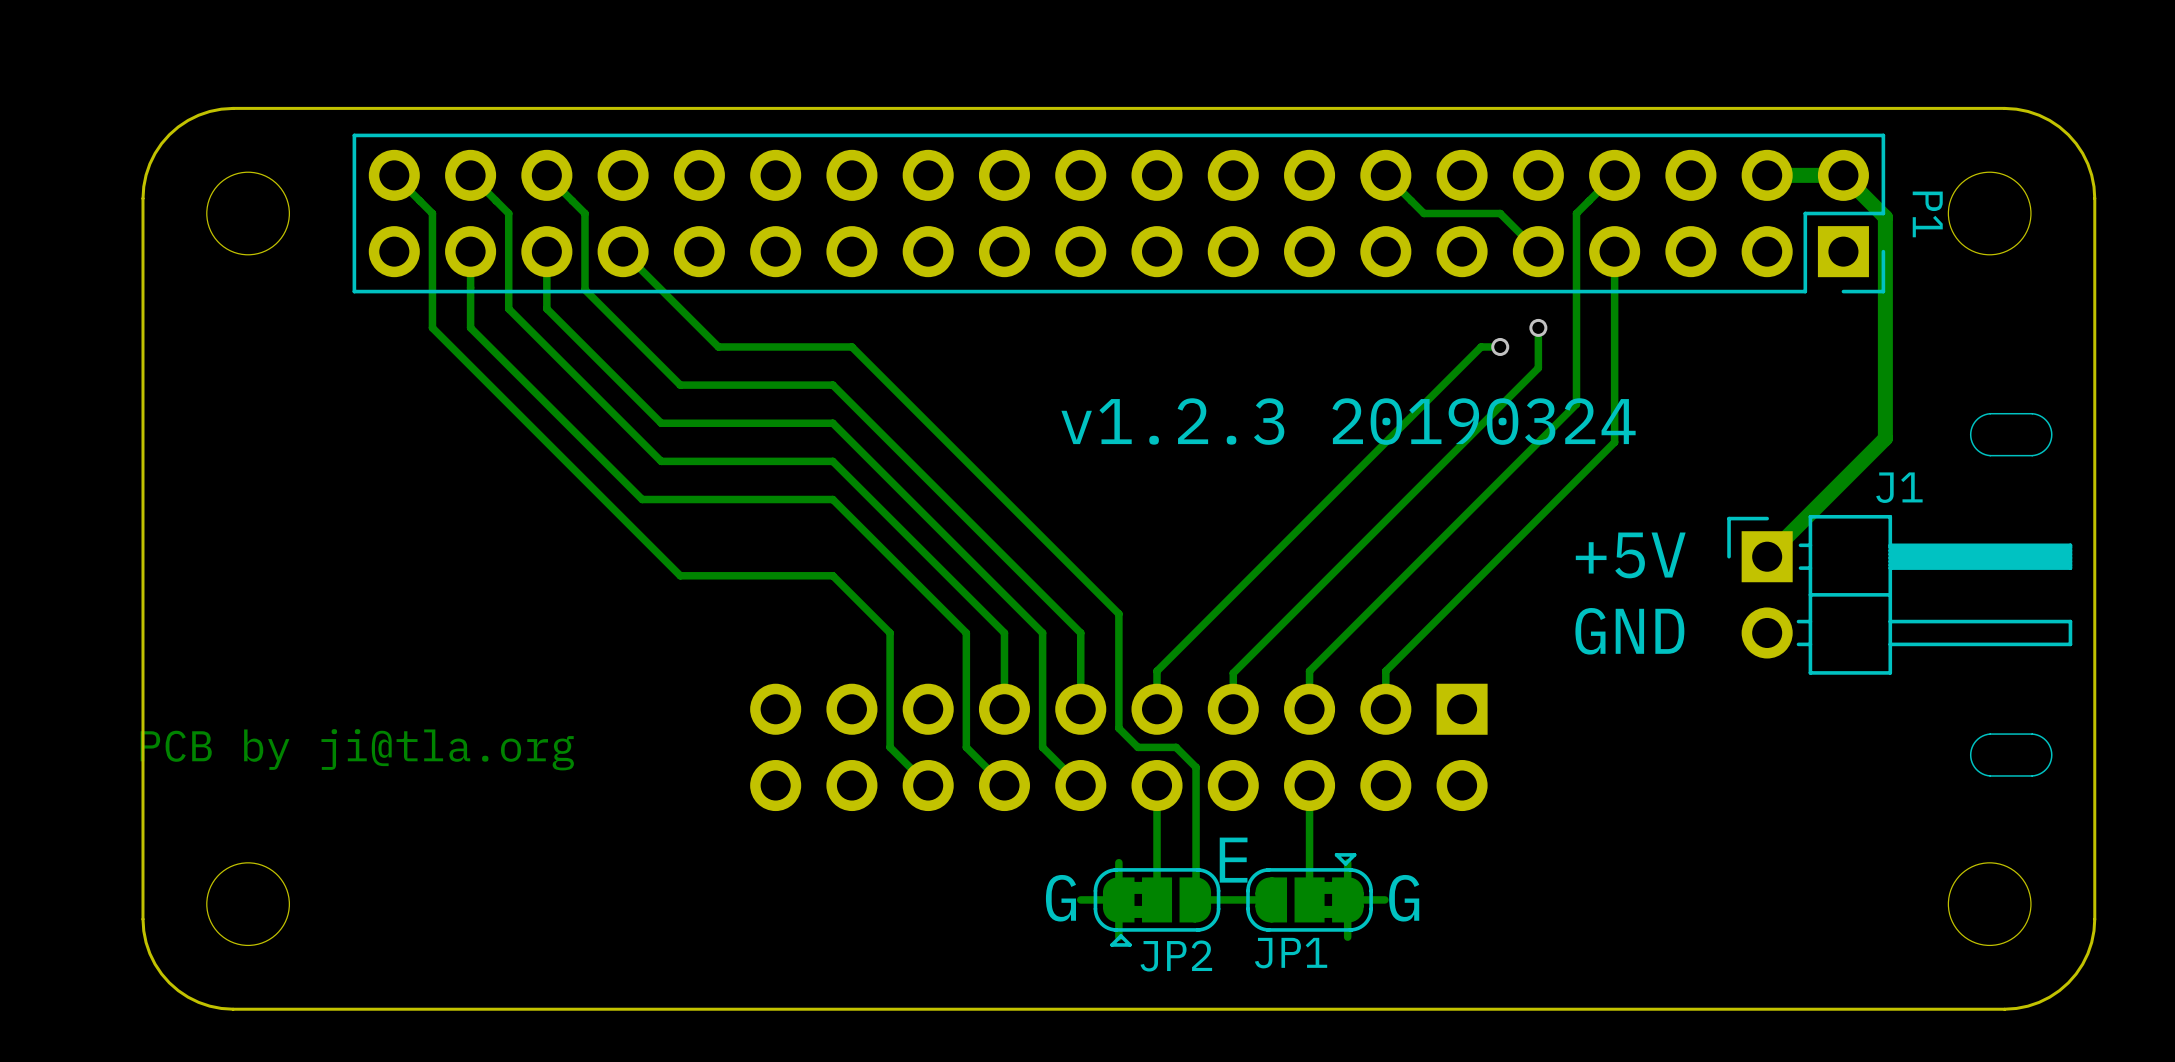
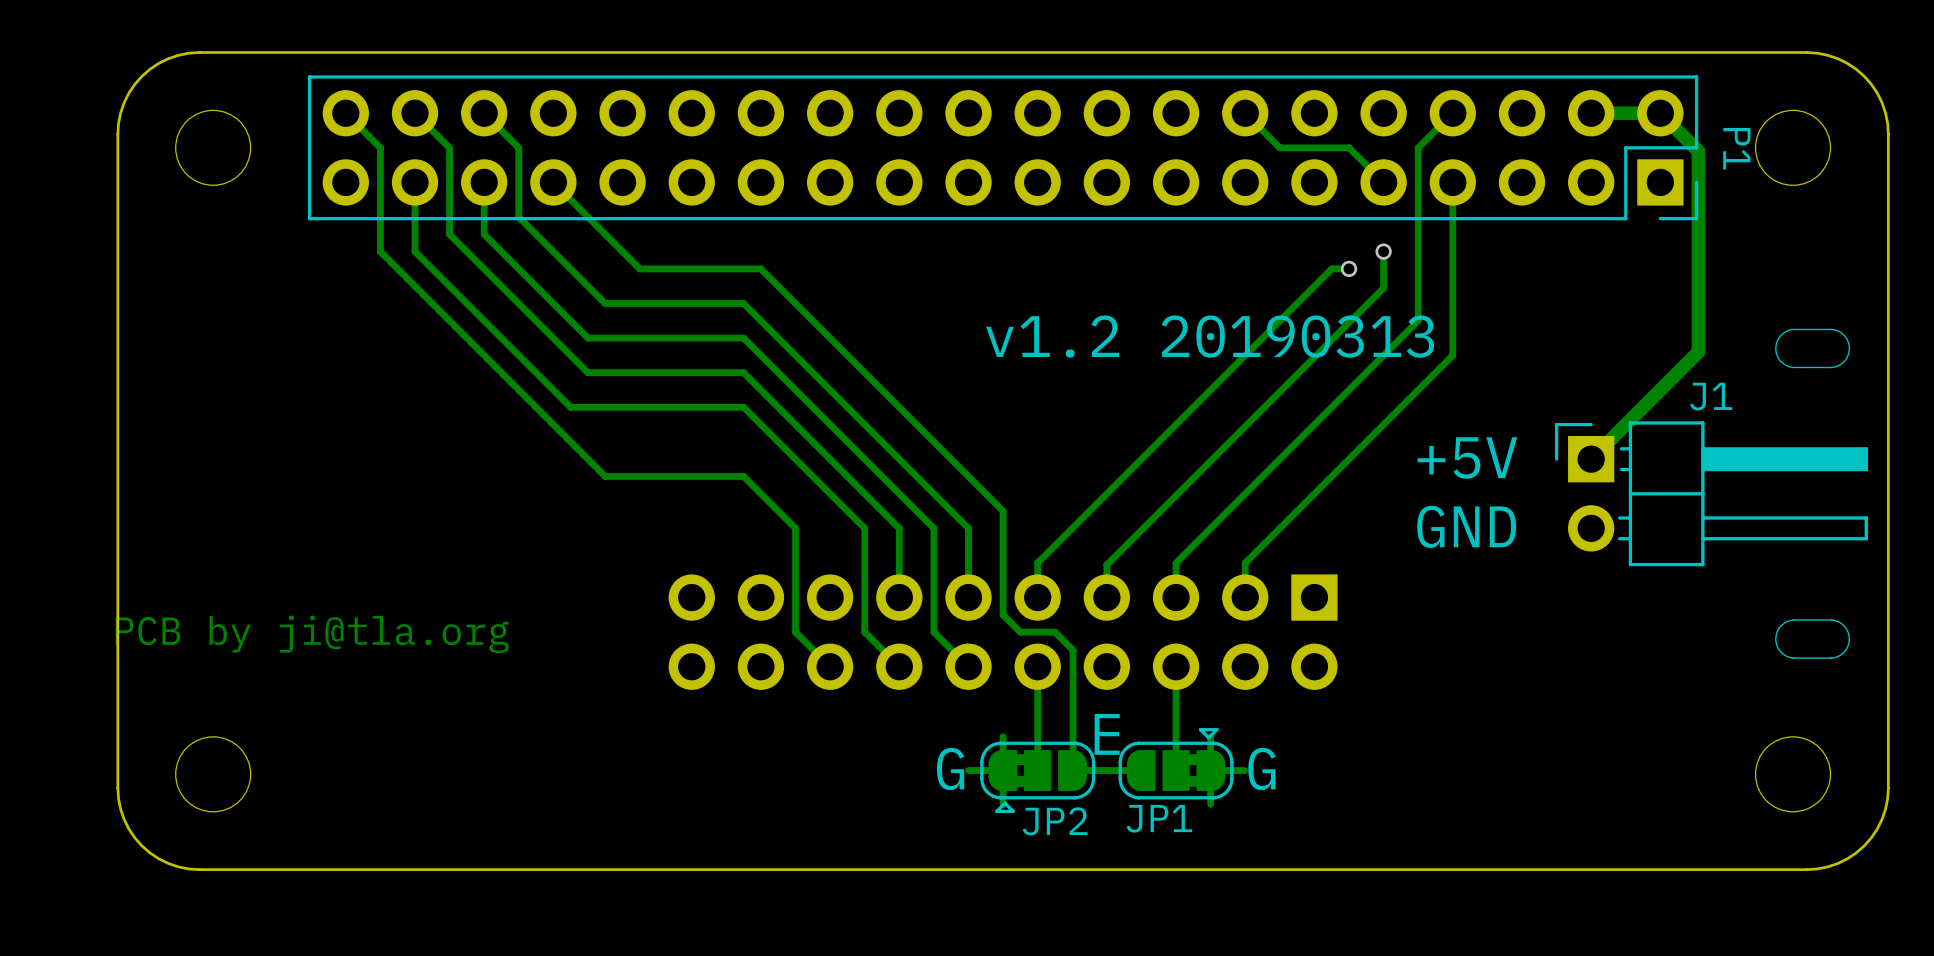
text: v1.2.3 20190324 (1348, 421) -> v1.2 20190313 (1210, 336)

